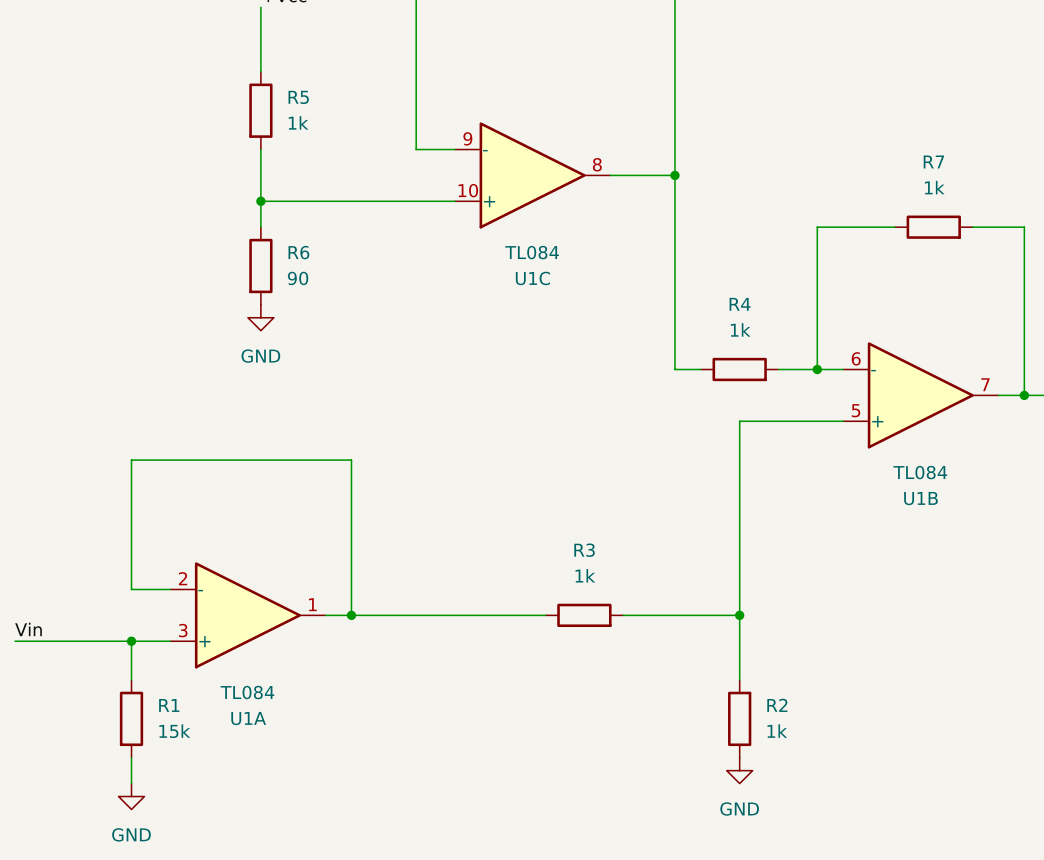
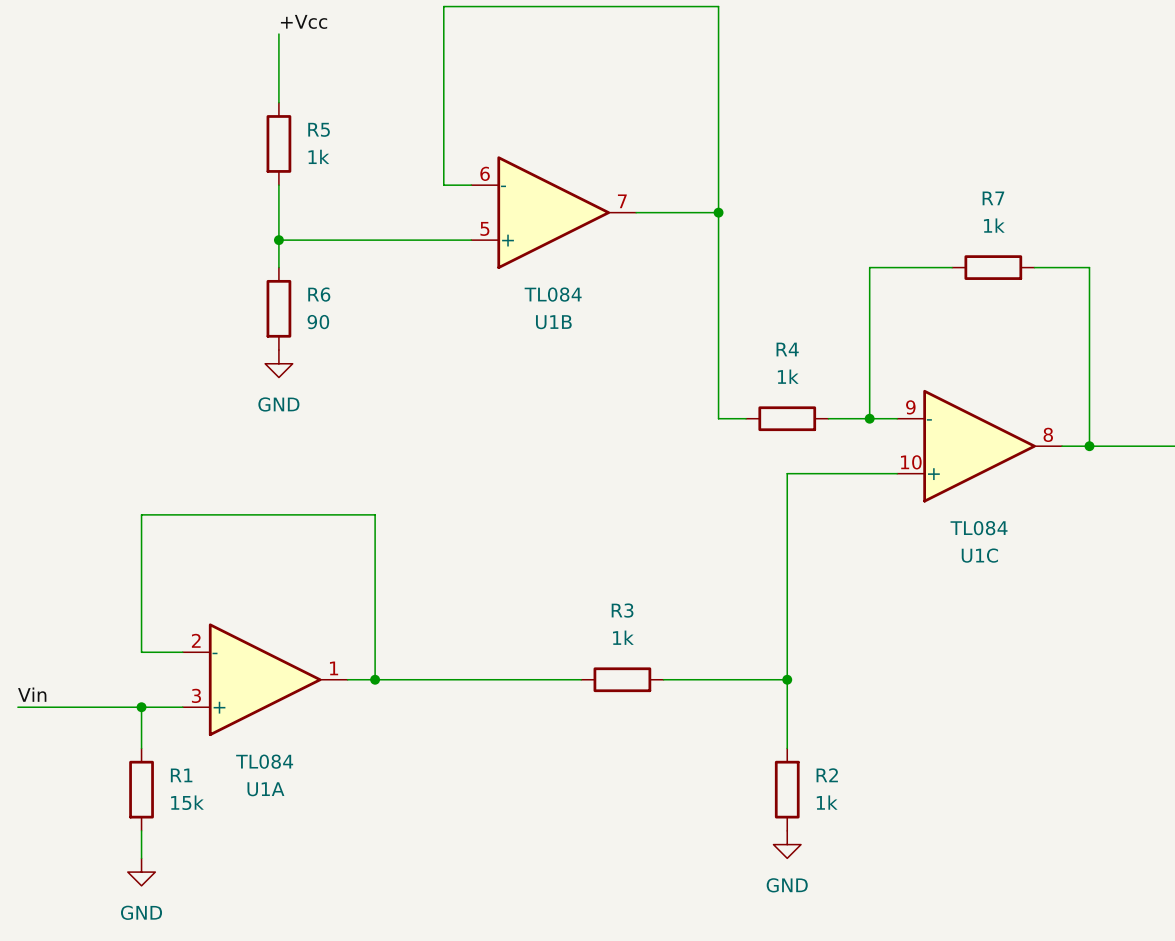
U1C position: (532, 175) -> (979, 446)
U1B position: (920, 395) -> (553, 212)

